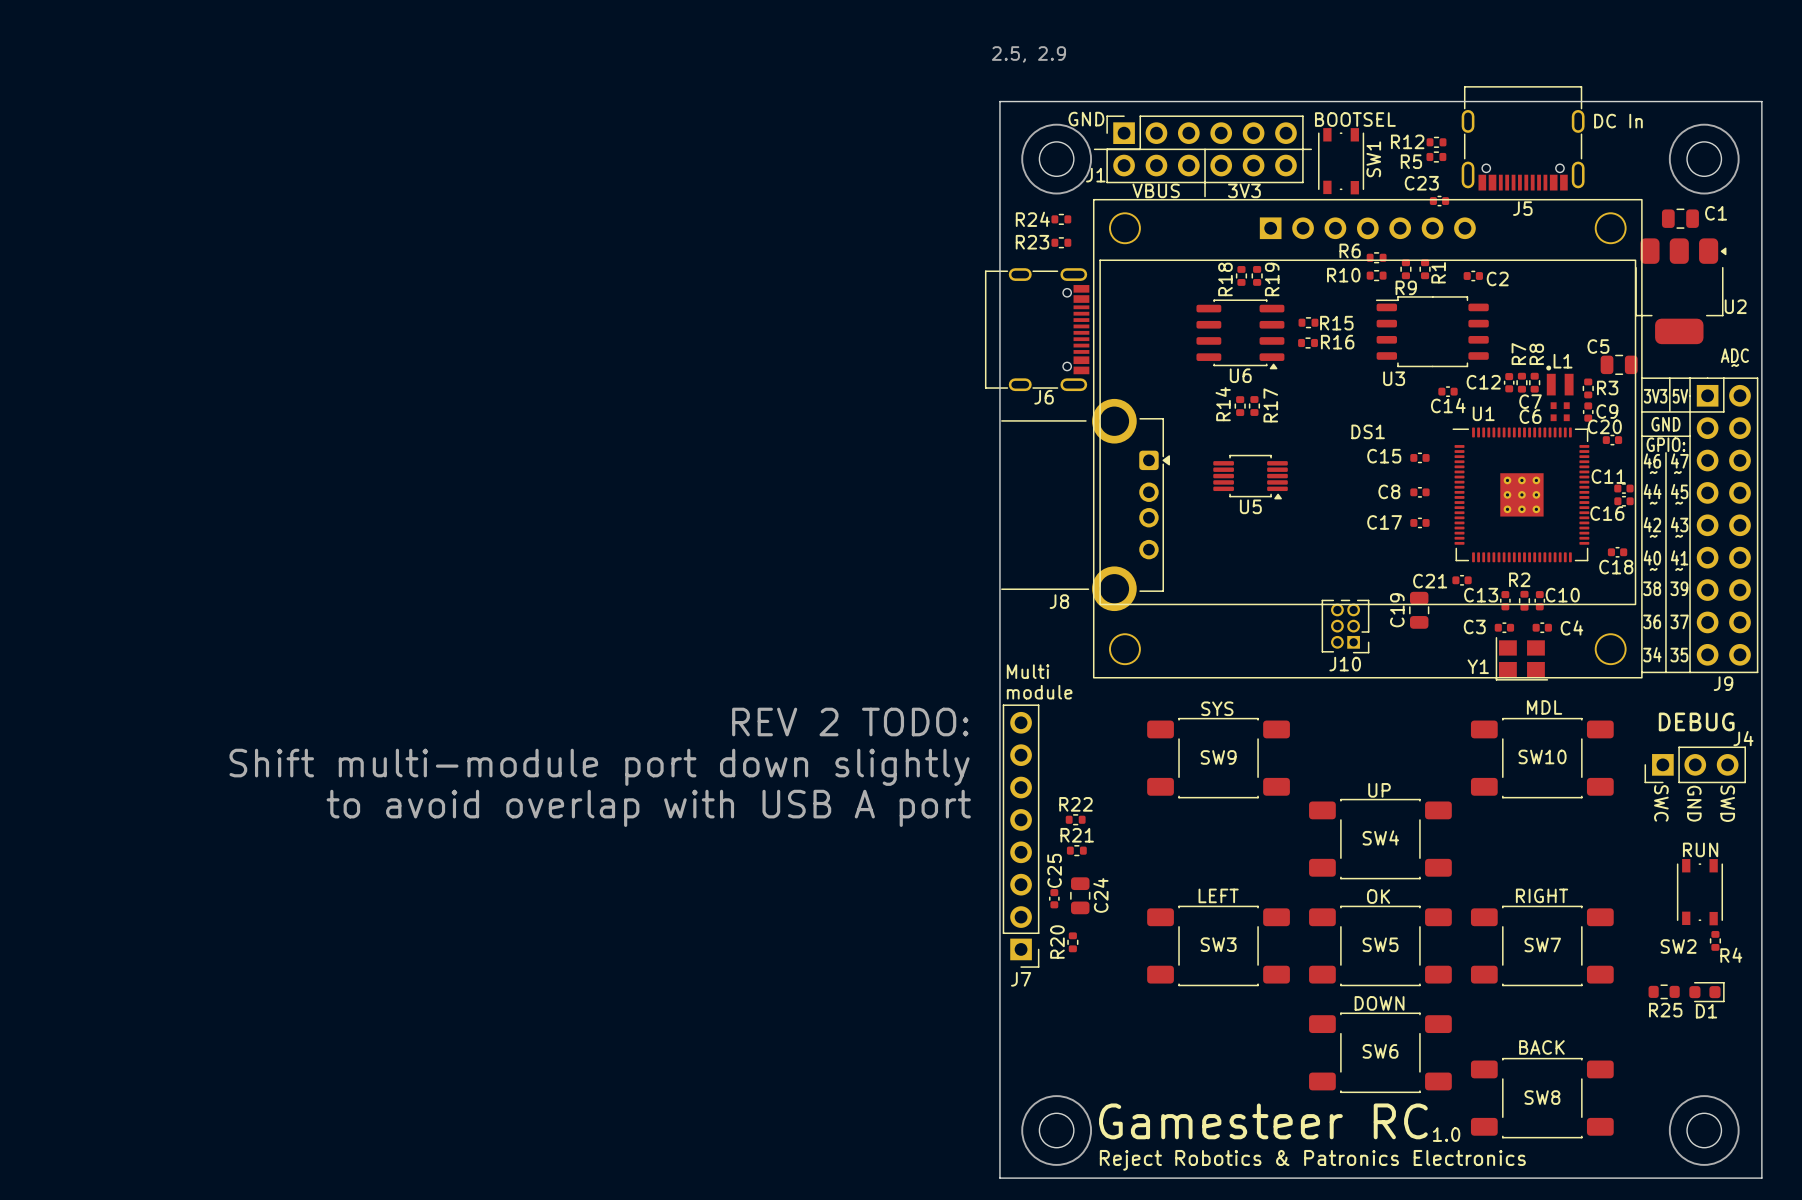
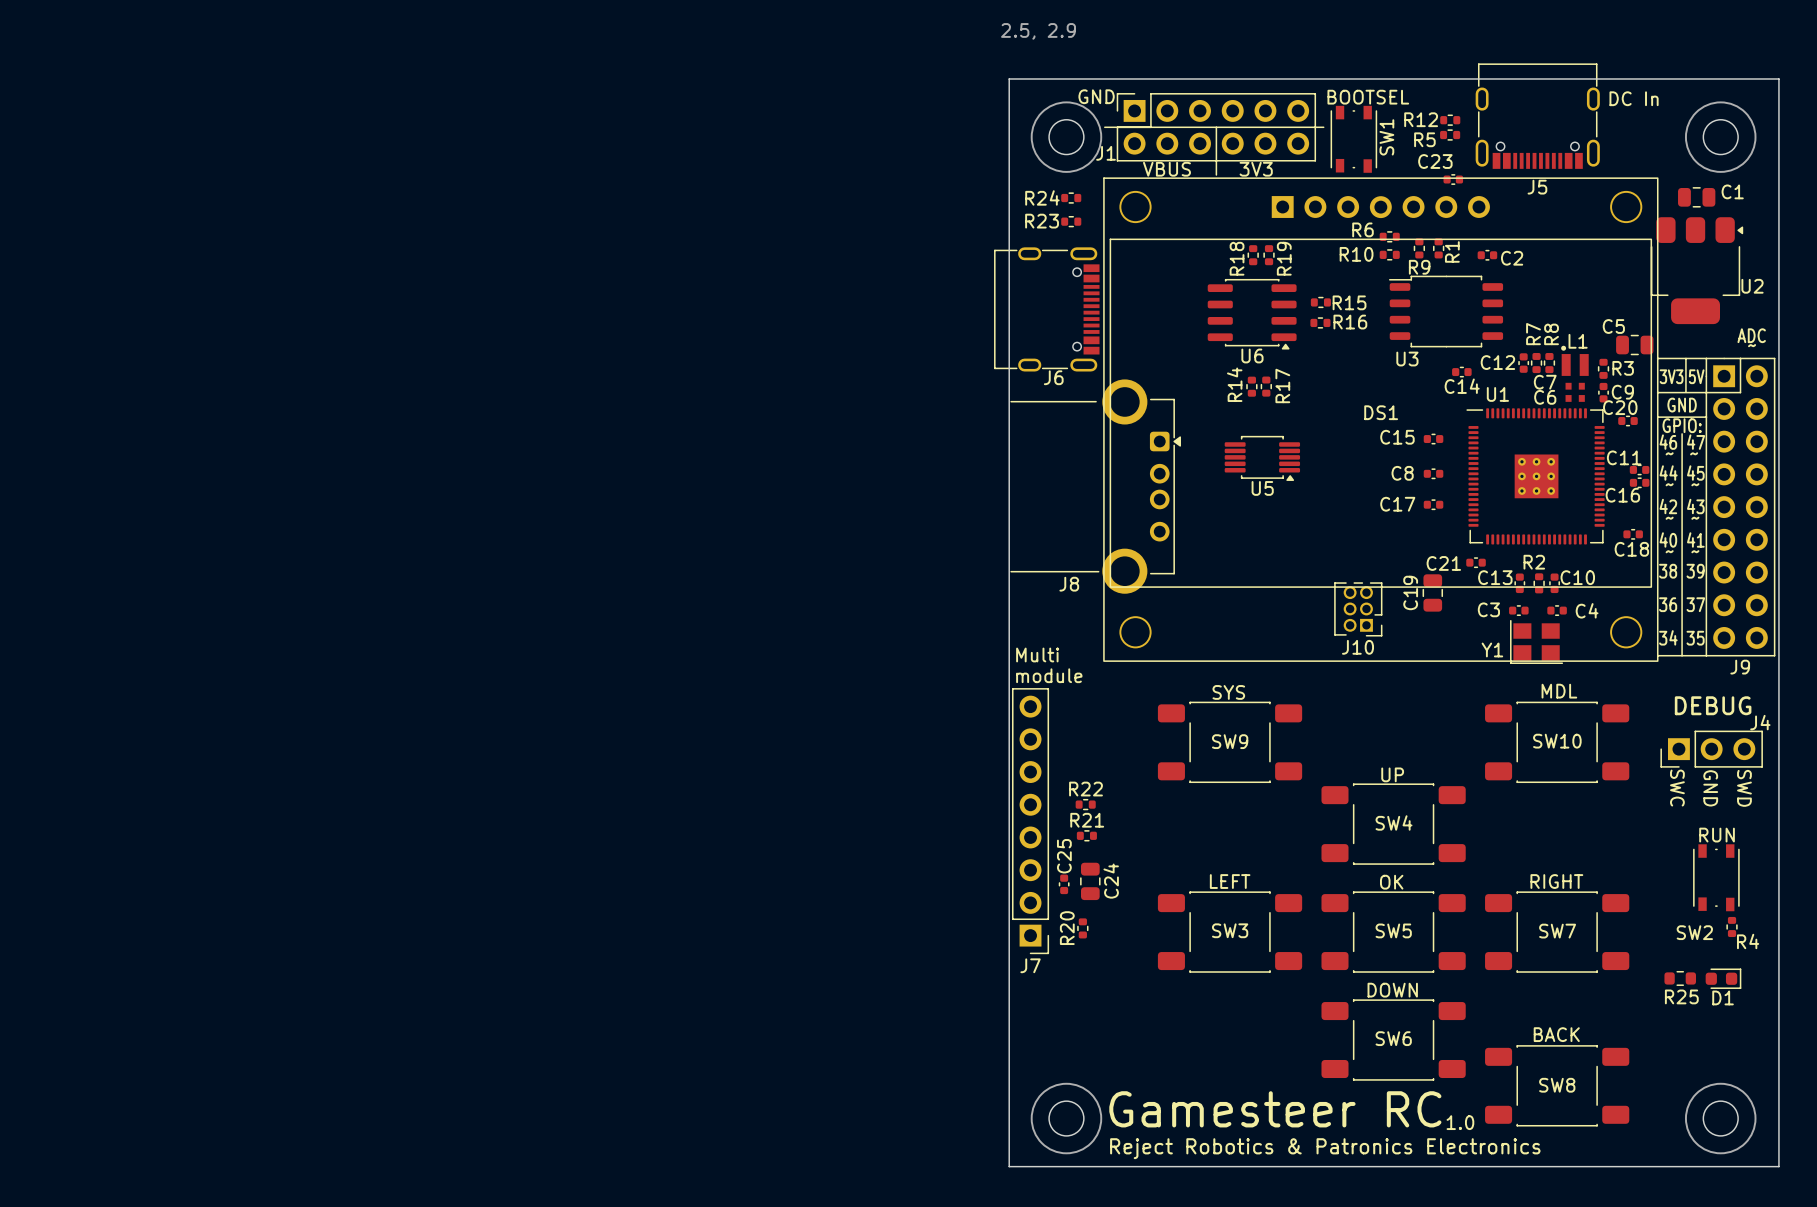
text: REV 2 TODO: (850, 722) -> none
text: Shift multi-module port down slightly (599, 767) -> none
text: to avoid overlap with USB A port (648, 808) -> none

